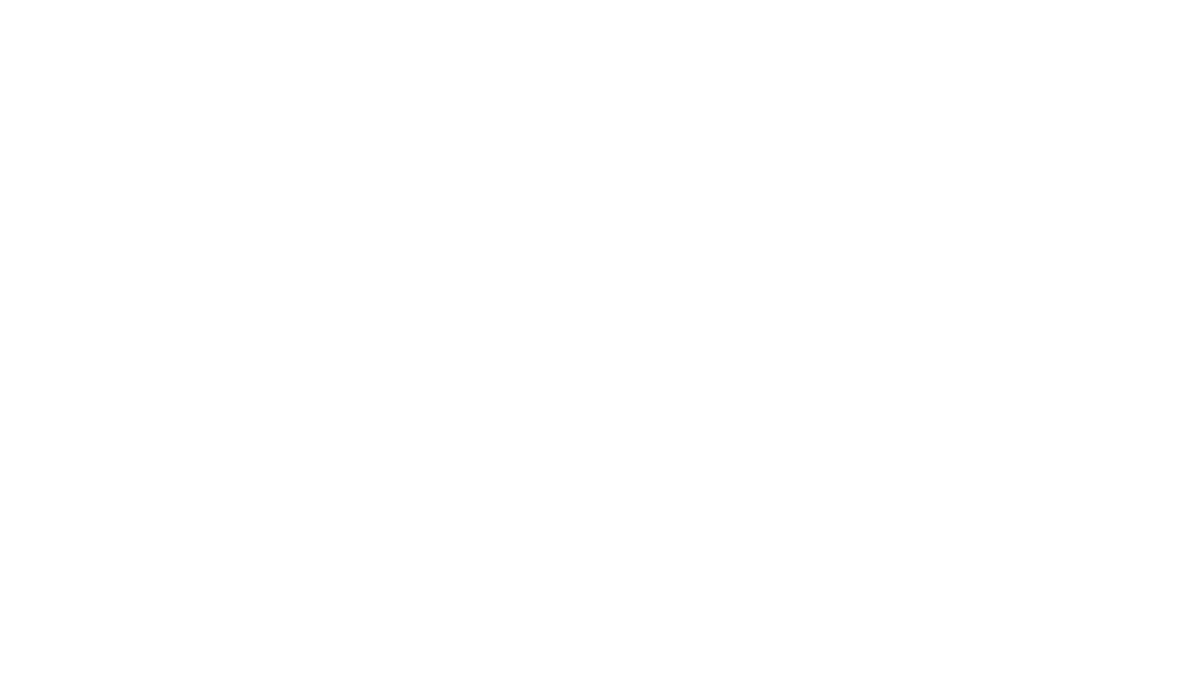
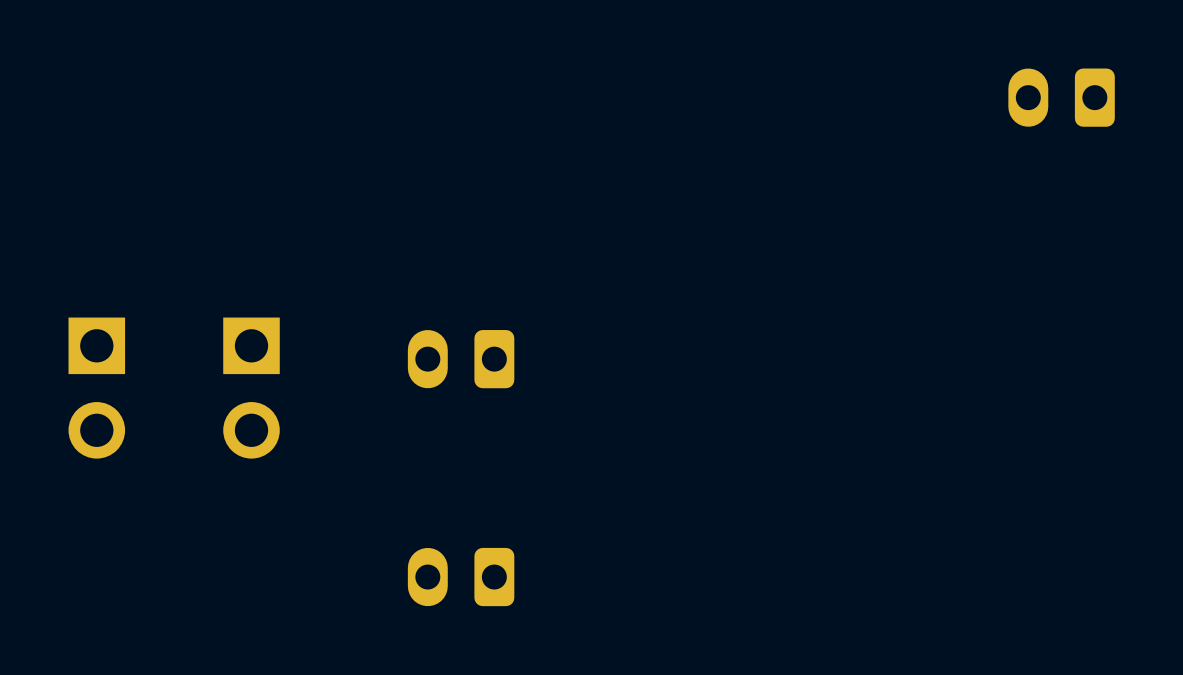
part: none -> (1061, 97)
part: none -> (461, 359)
part: none -> (96, 388)
part: none -> (251, 388)
part: none -> (461, 577)

